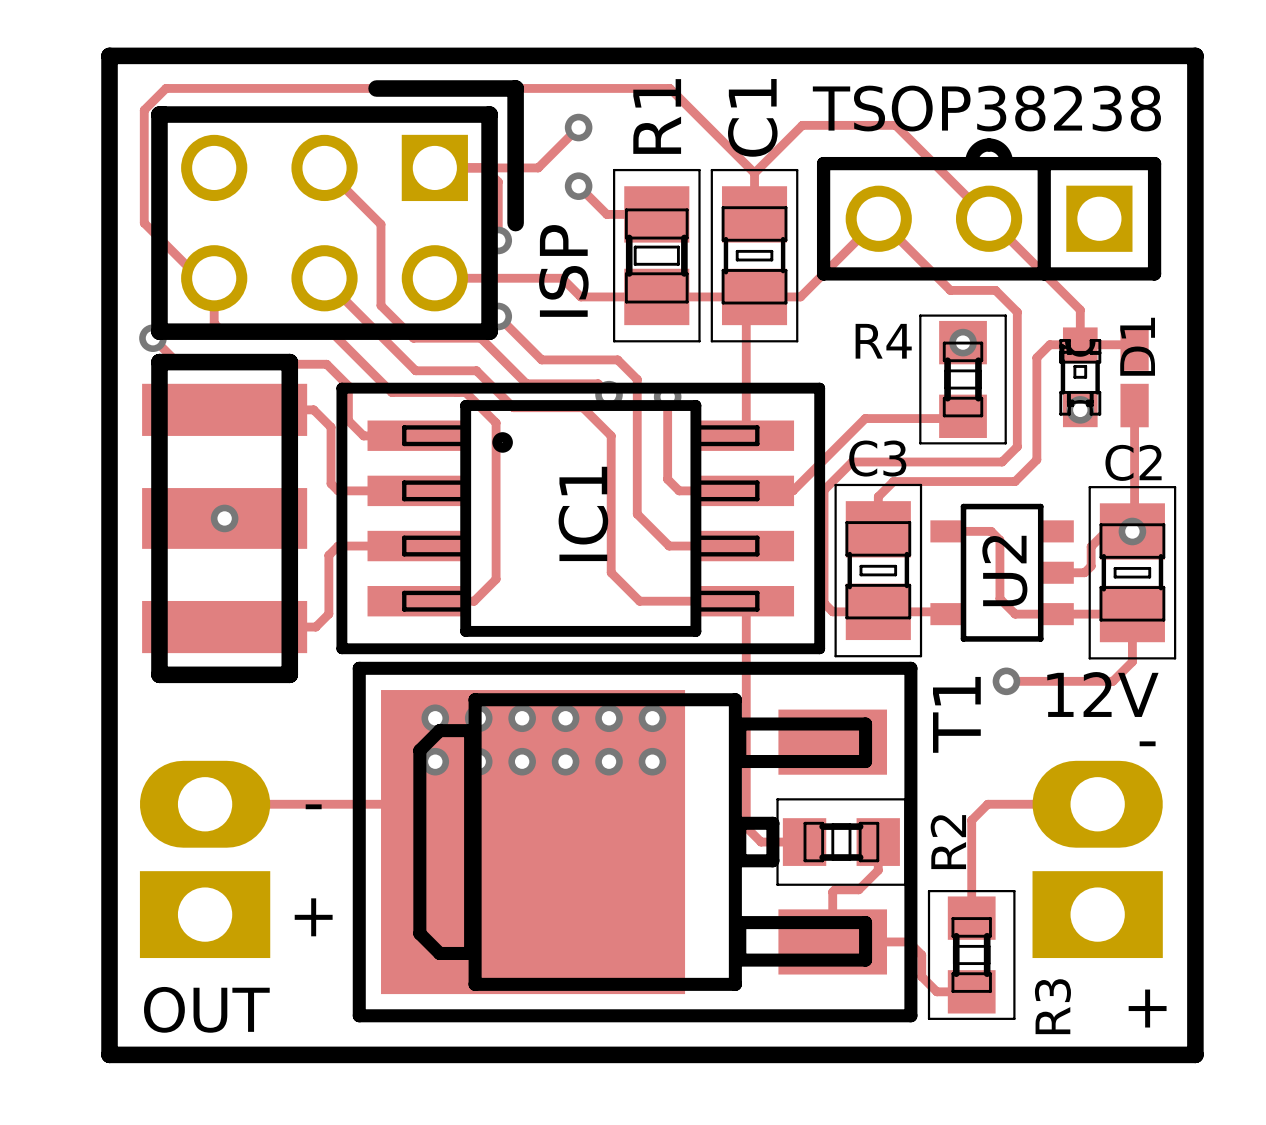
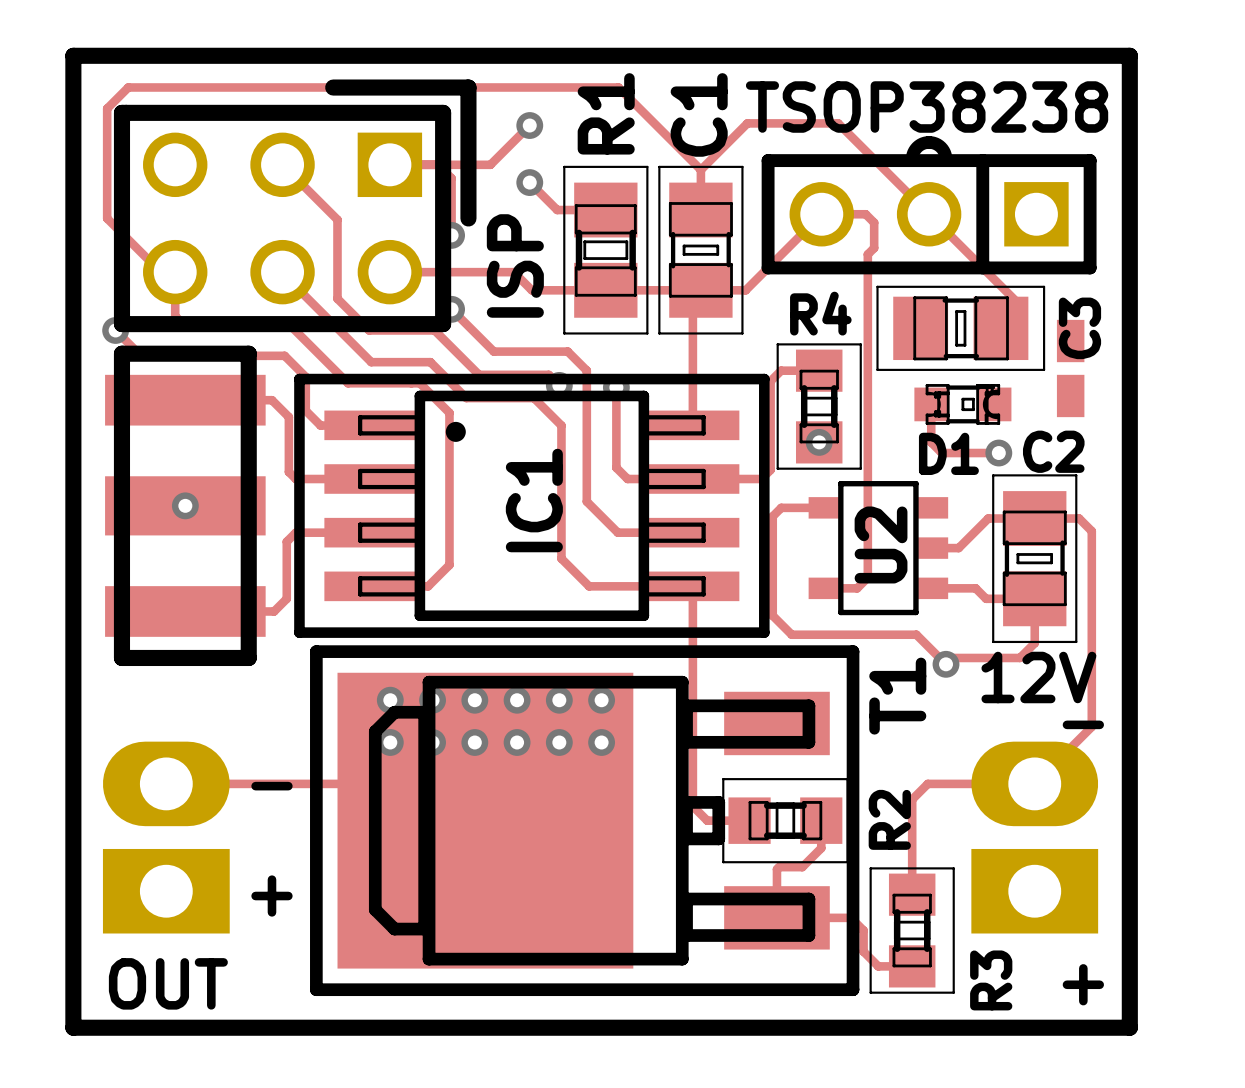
track: (878, 218) (950, 290) (995, 290) (1017, 312) (1017, 446) (1002, 461) (852, 461) (824, 490) (824, 603) (832, 611) (944, 611) (946, 614) -> (821, 214) (865, 214) (874, 222) (874, 248) (867, 254) (867, 577) (857, 588) (824, 588)
R4 name position: R4 (883, 341) -> R4 (820, 313)
via: (963, 342) -> none
track: (1134, 349) (1130, 344) (1049, 344) (1036, 357) (1036, 459) (1015, 481) (893, 481) (878, 496) (878, 529) -> none
D1 rotation: 0° (1080, 377) -> 90° clockwise (962, 404)
D1 position: (1080, 377) -> (962, 404)
R4 position: (963, 379) -> (819, 406)
track: (1134, 405) (1134, 529) (1132, 531) -> (1034, 783) (1091, 726) (1091, 531) (1079, 518) (1068, 518)
via: (1080, 409) -> none
track: none -> (931, 404) (931, 442) (941, 453) (998, 453)
track: (963, 416) (960, 418) (865, 418) (792, 490) -> (819, 370) (781, 370) (770, 381) (770, 469) (761, 479) (738, 479)
via: none -> (819, 442)
C2 name position: C2 (1133, 462) -> C2 (1053, 451)
via: none -> (998, 453)
track: (946, 531) (991, 531) (999, 540) (999, 598) (1015, 614) (1047, 614) -> (932, 588) (975, 588) (986, 598)
track: (1106, 531) (1091, 546) (1091, 566) (1084, 572) (1057, 572) -> (1043, 518) (988, 518) (958, 548) (932, 548)
via: (1132, 531) -> none
C3 rotation: 0° (878, 570) -> 90° clockwise (960, 328)
C3 position: (878, 570) -> (960, 328)
U2 position: (1002, 572) -> (878, 548)
C2 position: (1132, 572) -> (1034, 558)
track: (1097, 614) (1132, 614) (1132, 661) (1112, 681) (1006, 681) -> (1034, 598) (1034, 643) (1019, 657) (939, 657) (916, 634) (791, 634) (772, 615) (772, 516) (781, 507) (824, 507)

